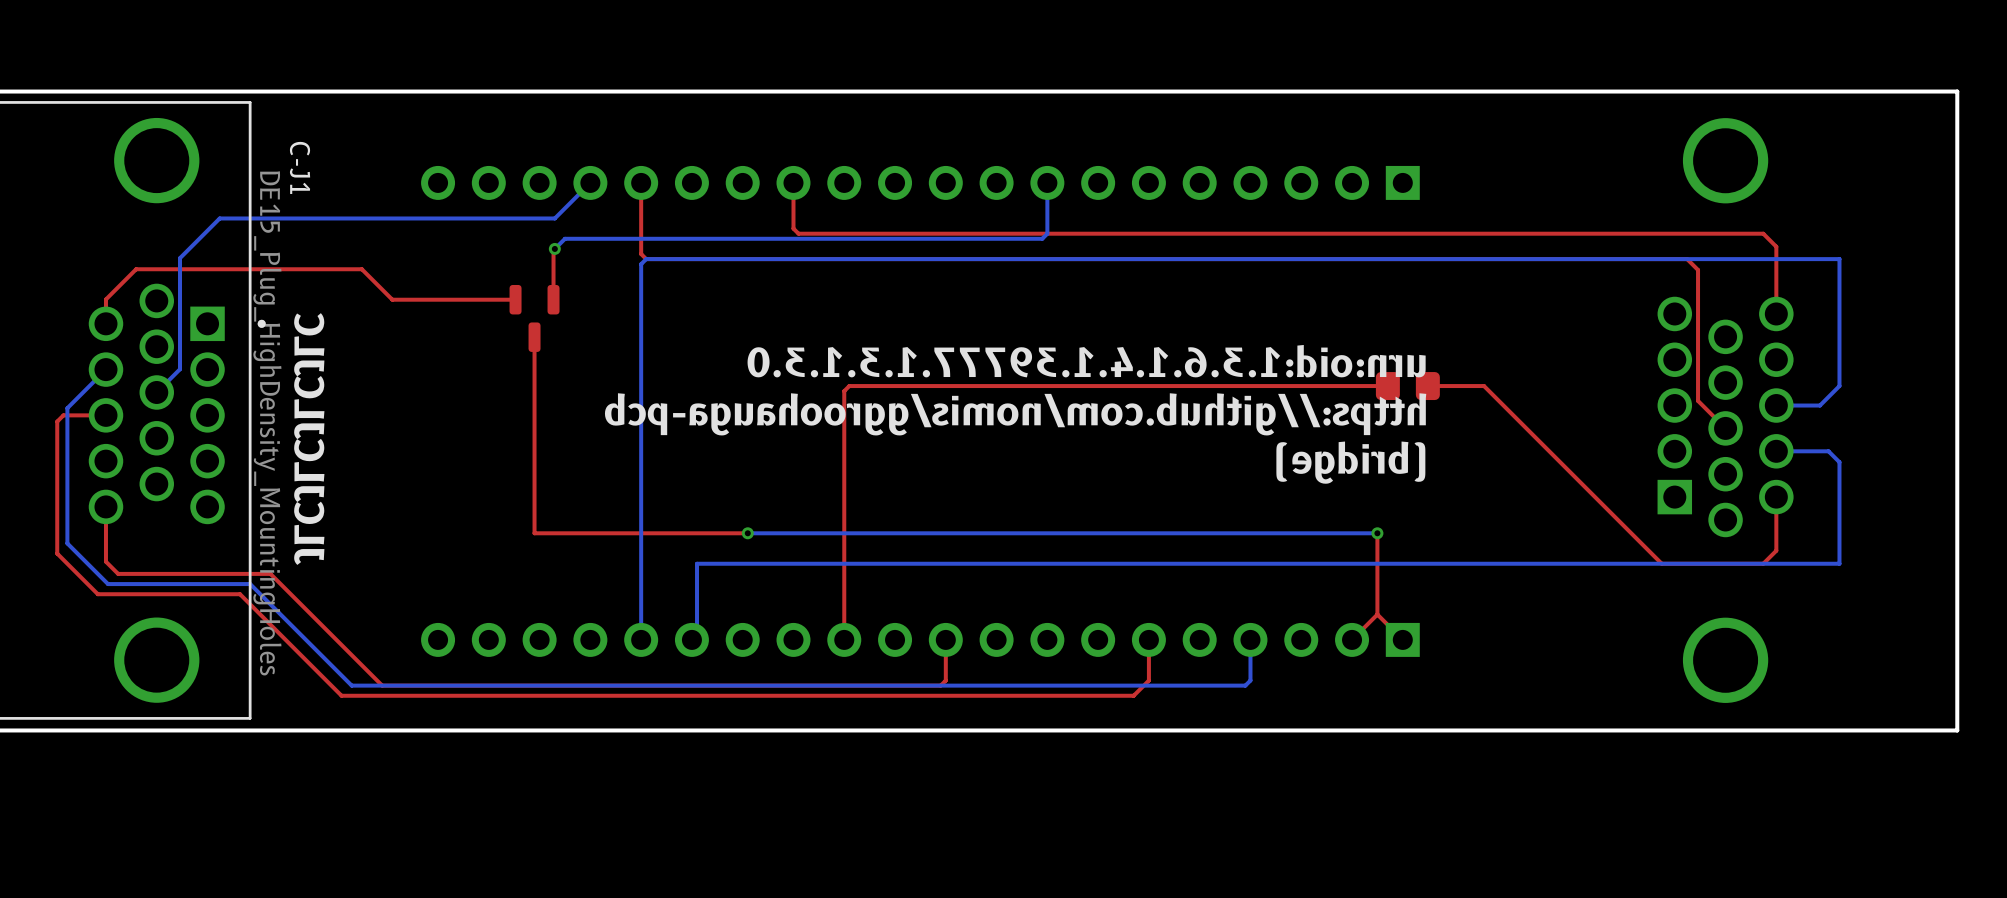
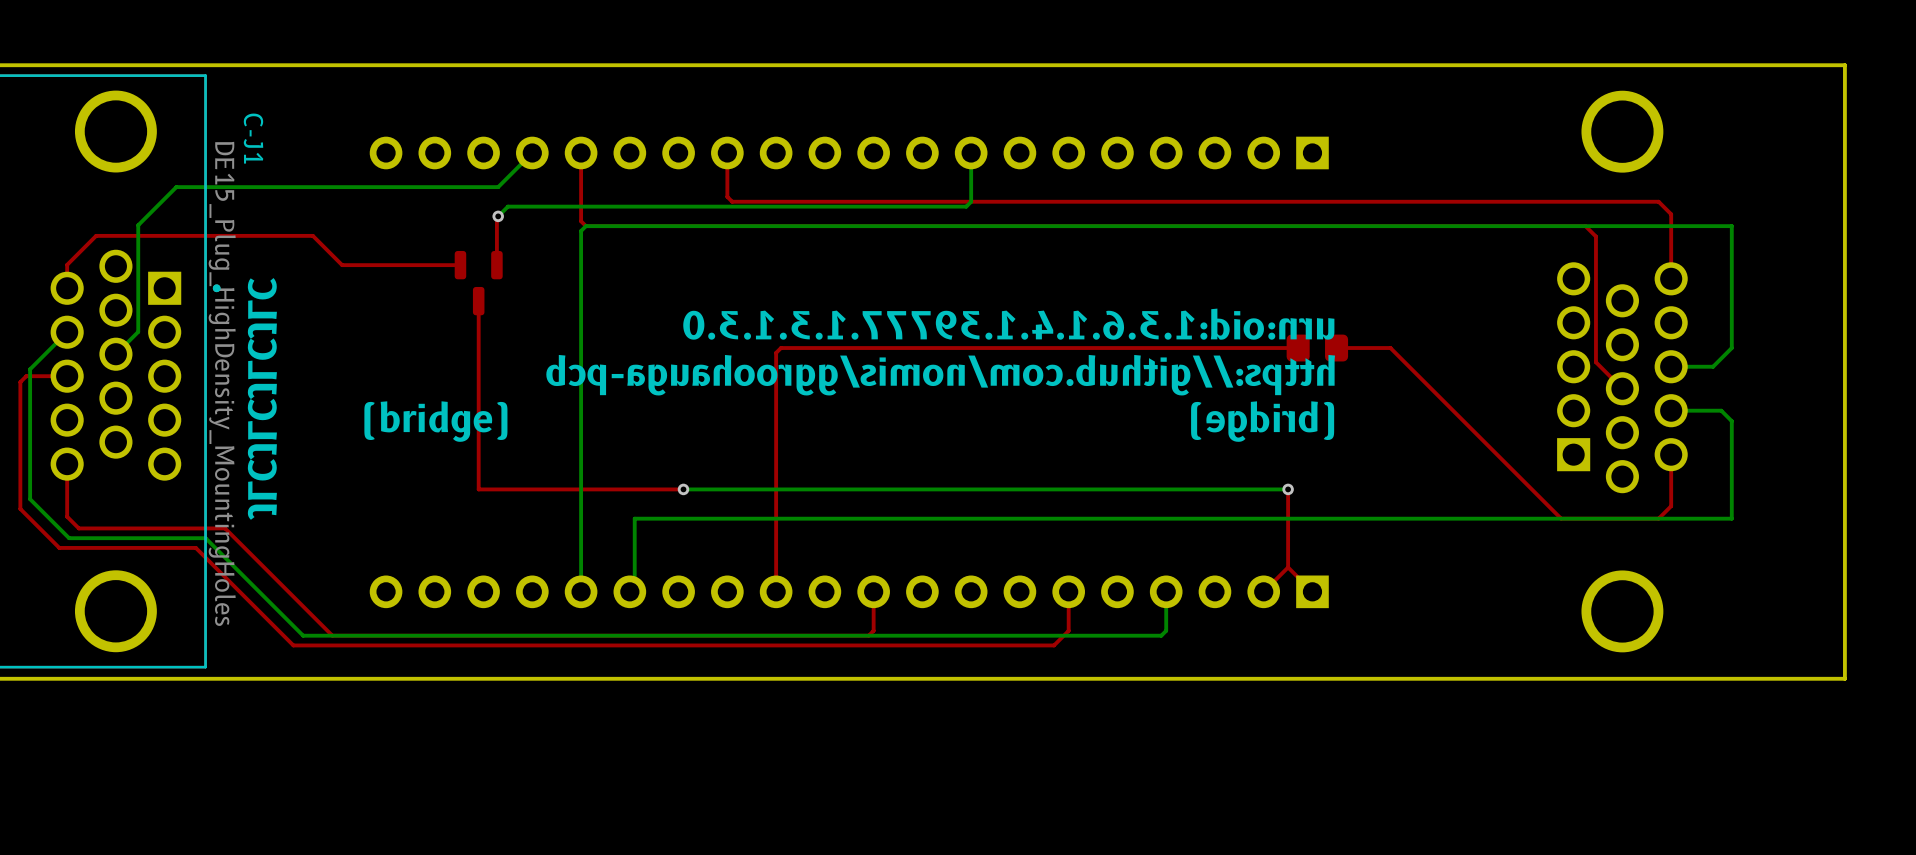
text: none -> (bridge) (435, 421)

